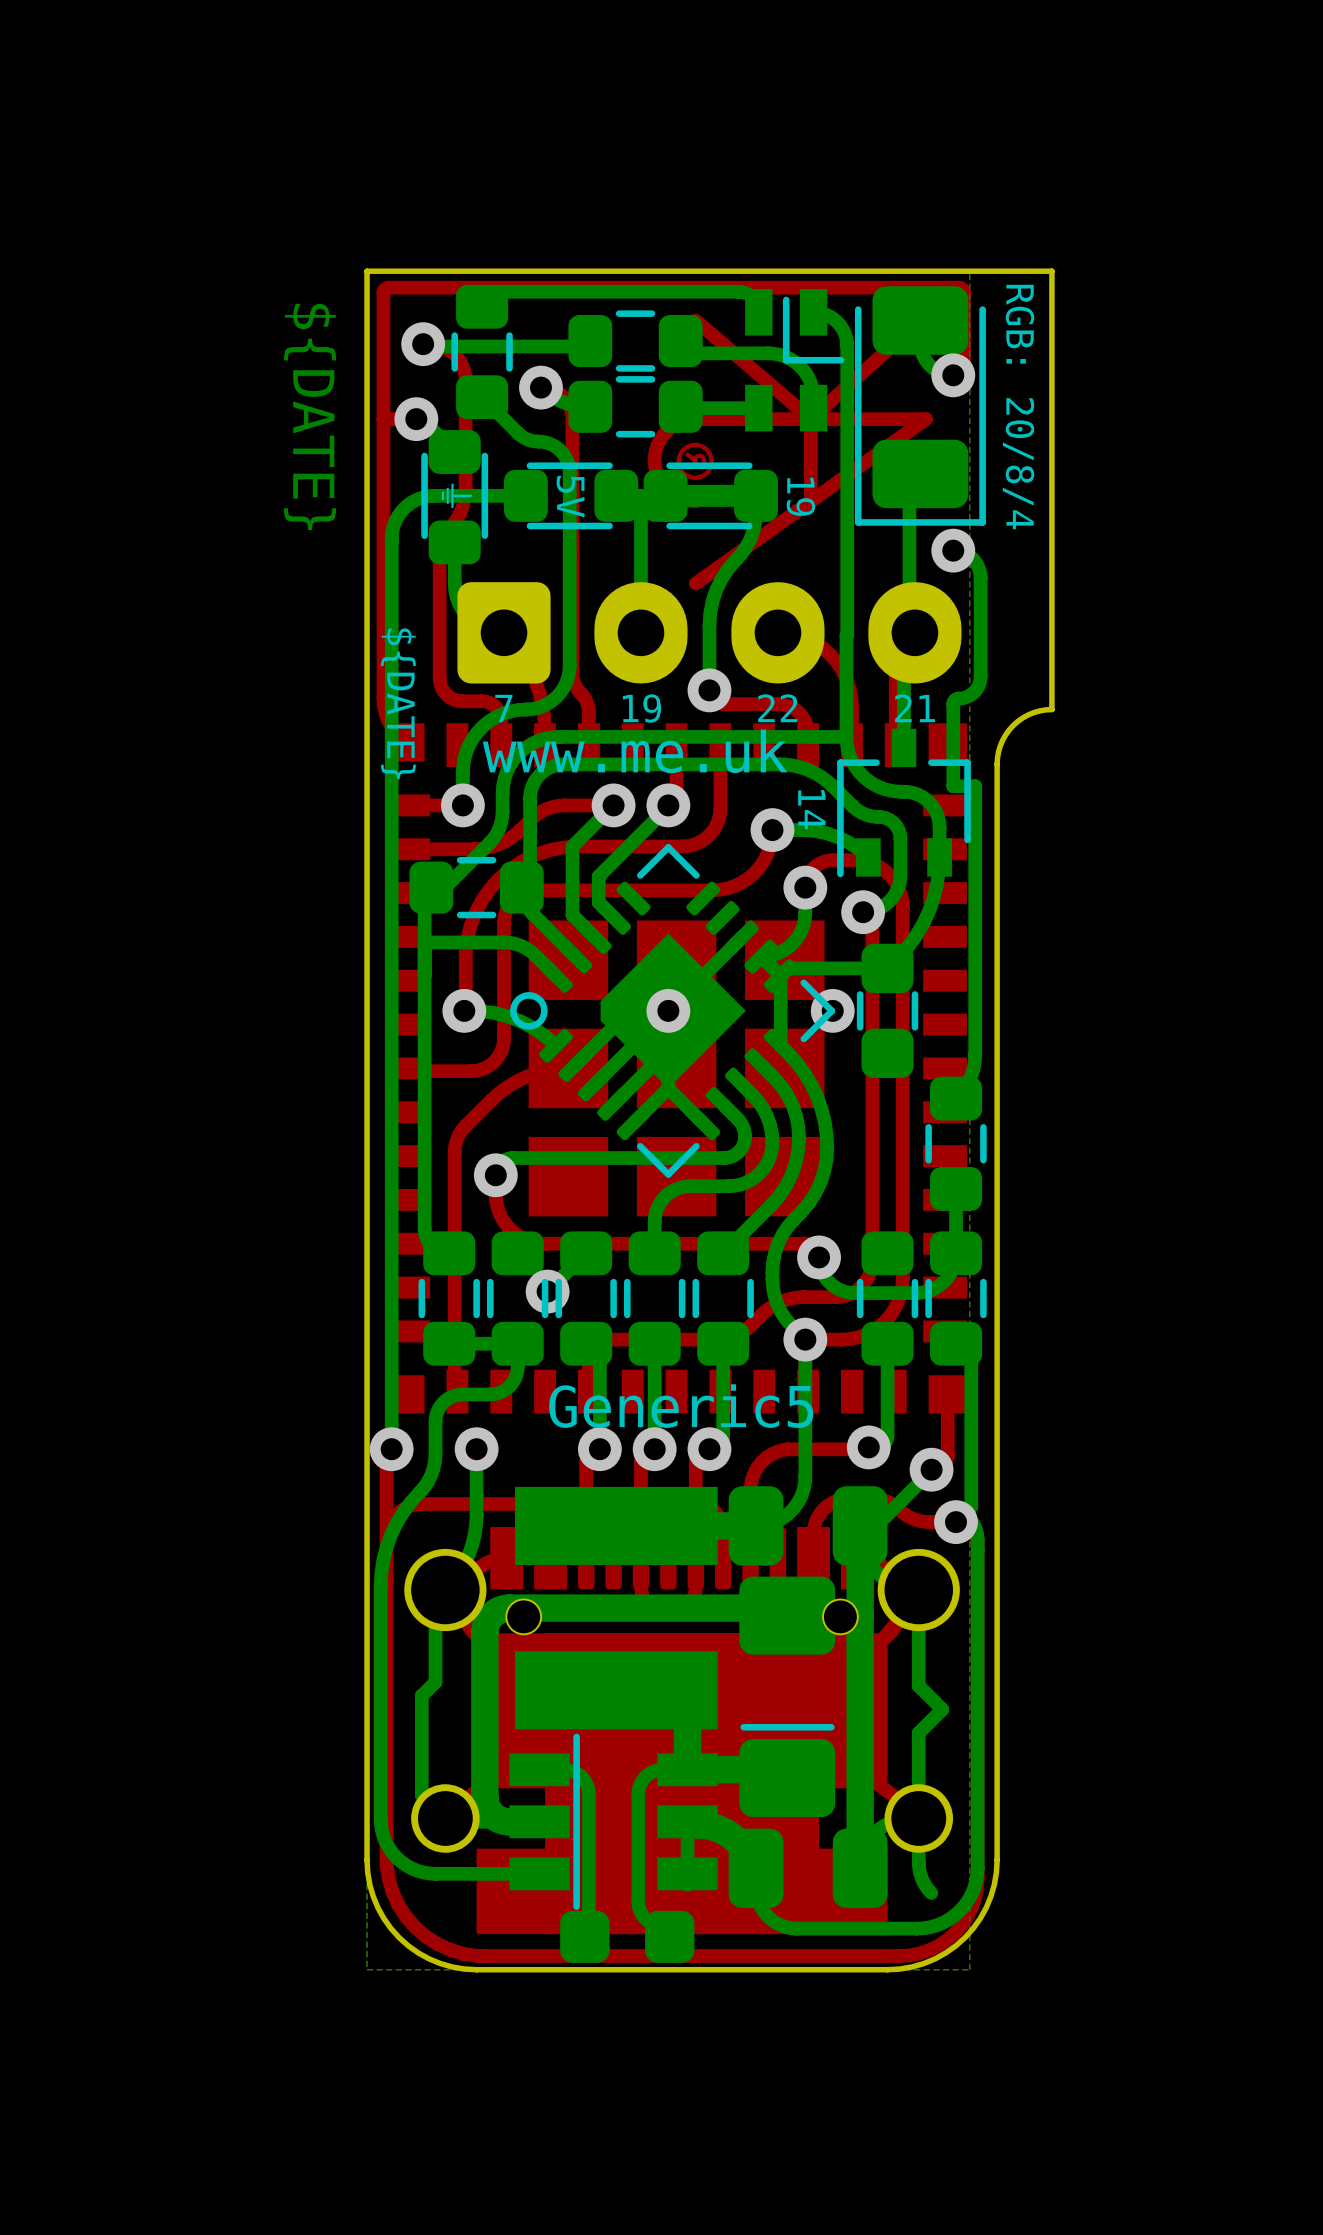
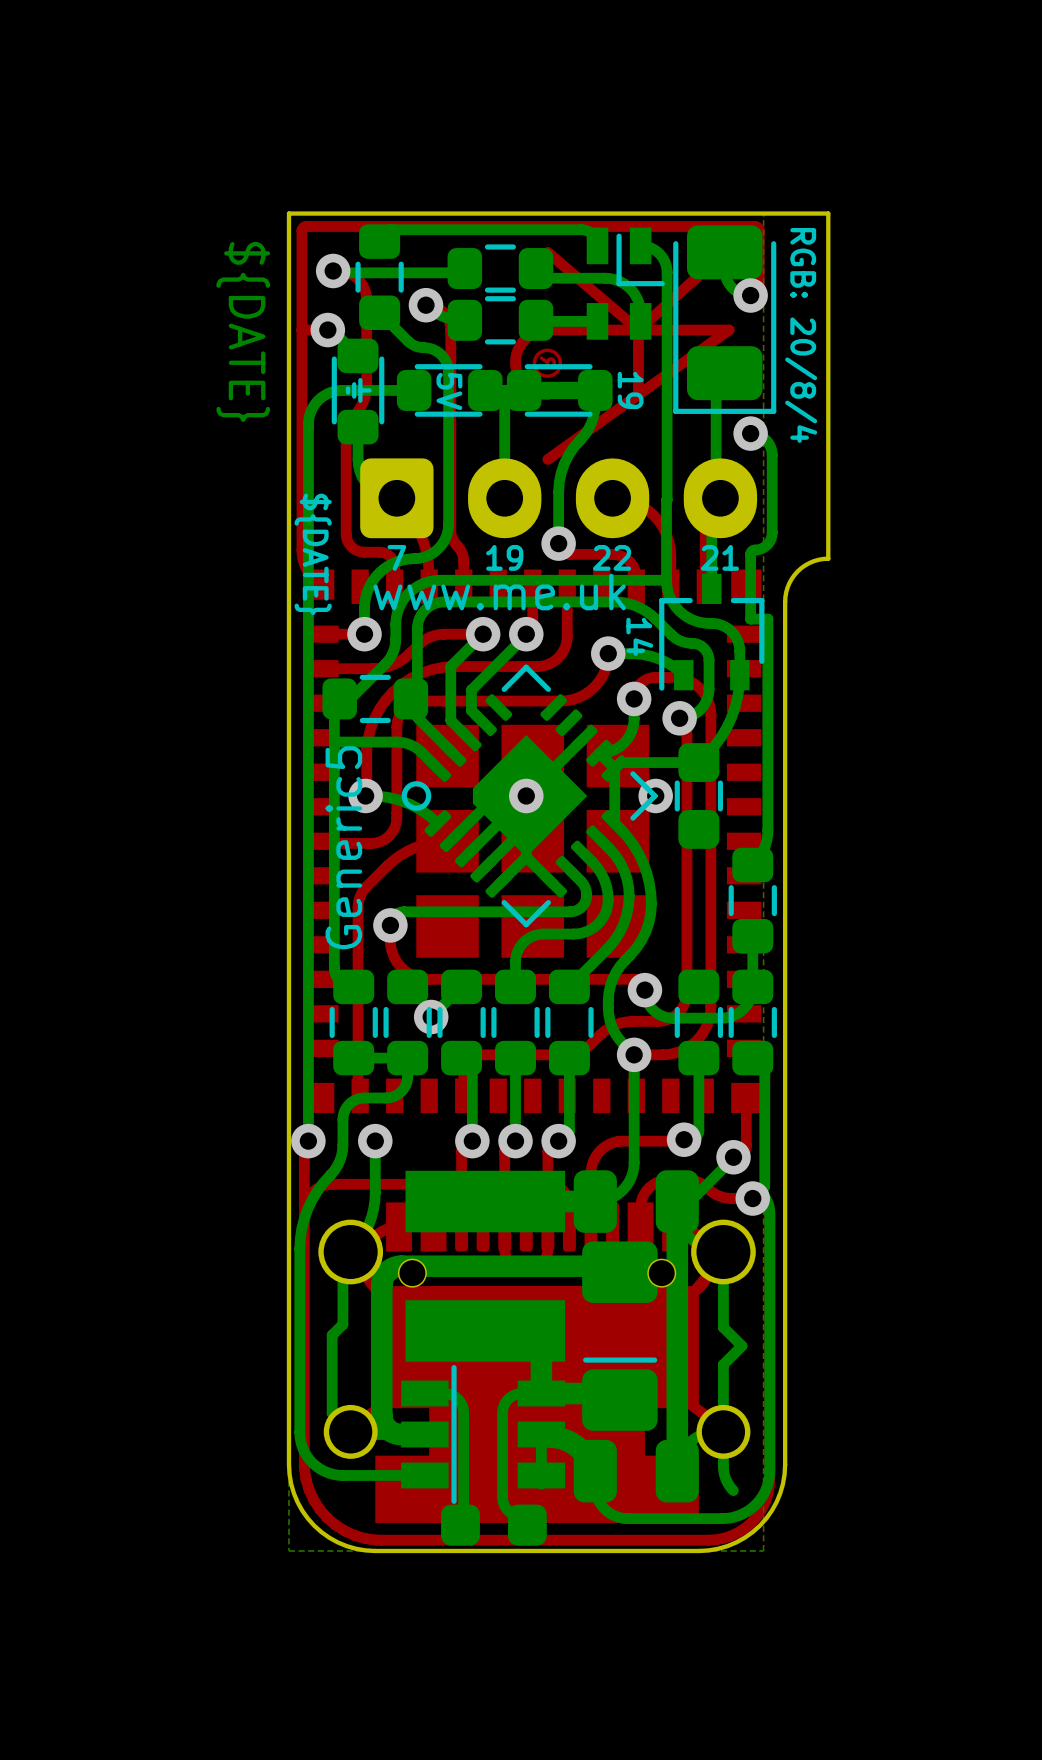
text rotation: 0° (681, 1406) -> 90° counterclockwise (343, 847)
text position: Generic5 (681, 1406) -> Generic5 (343, 847)

